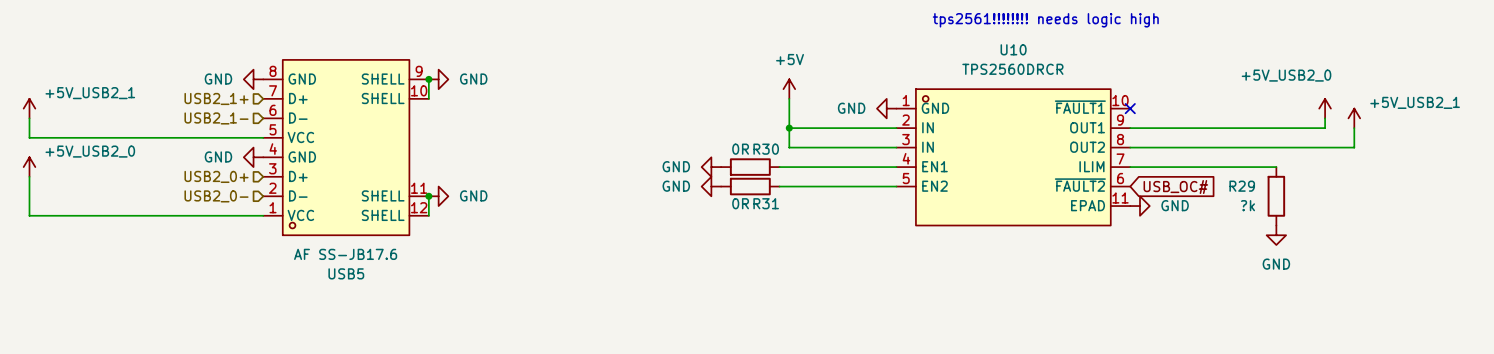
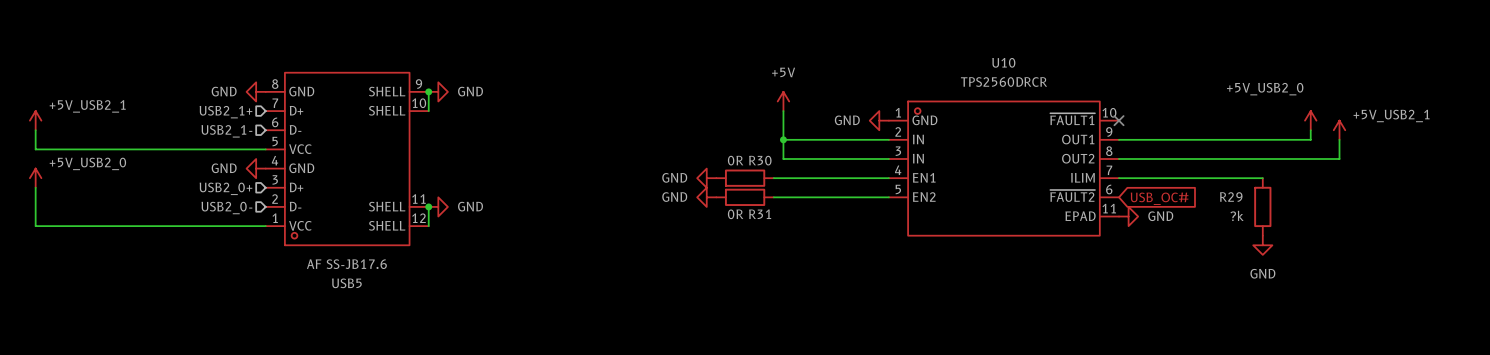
text: tps2561!!!!!!!! needs logic high (1045, 20) -> none

